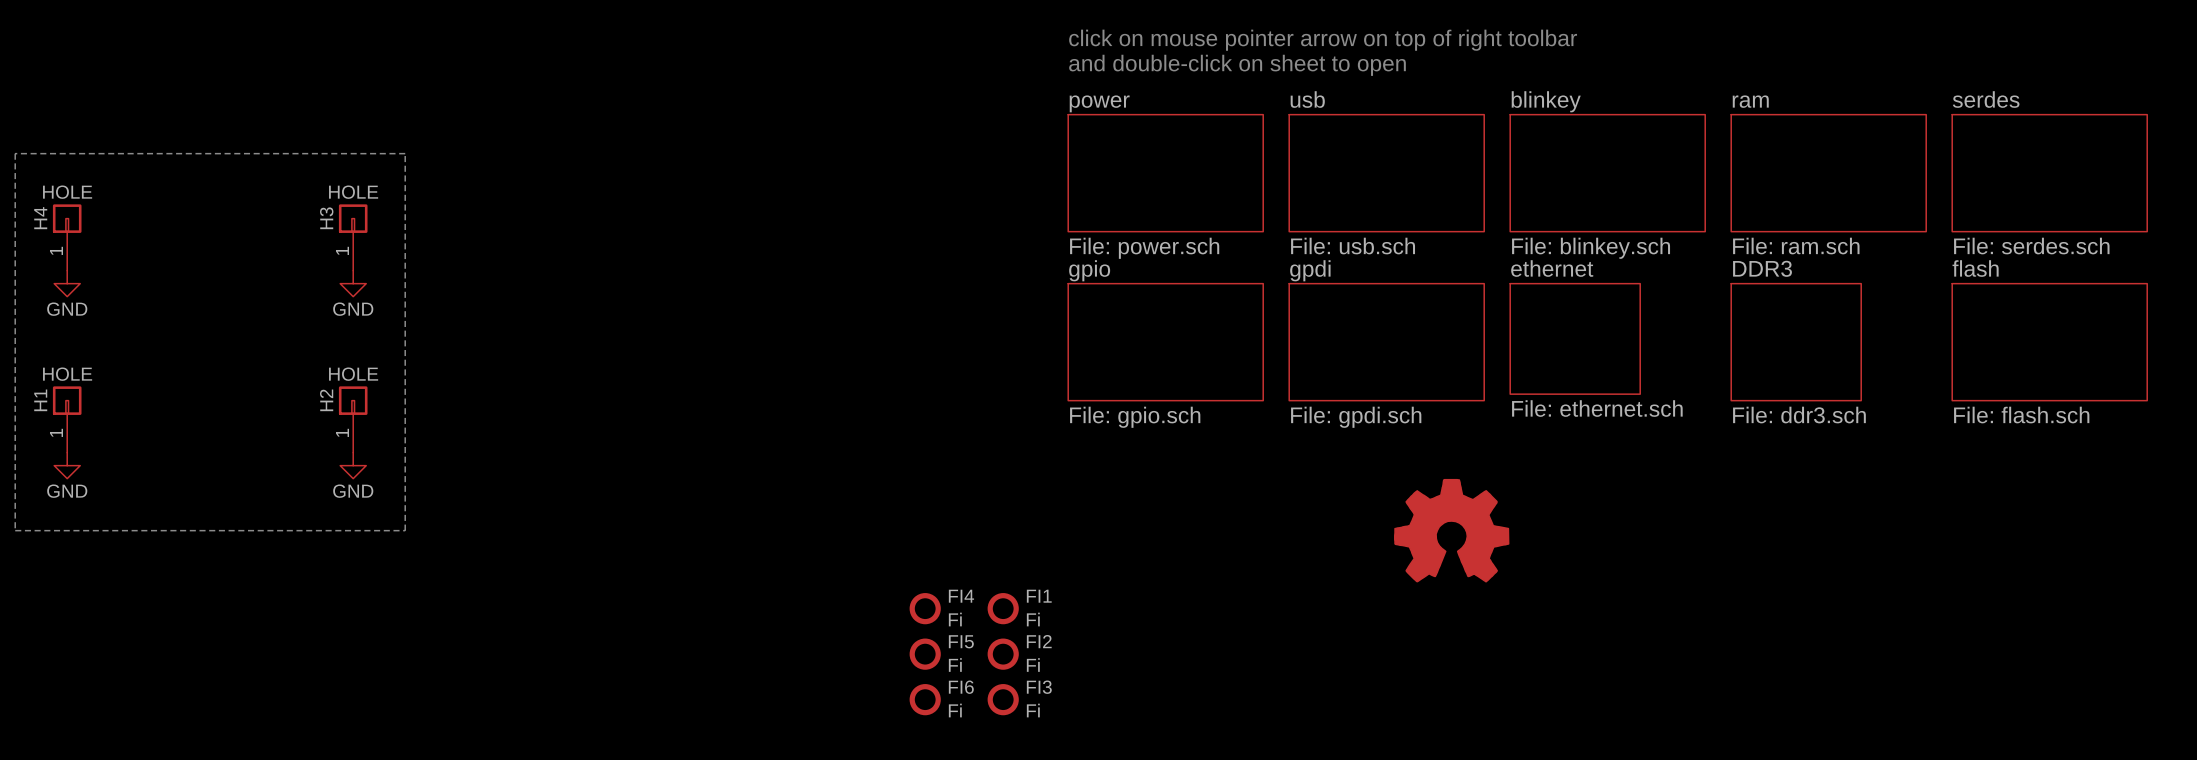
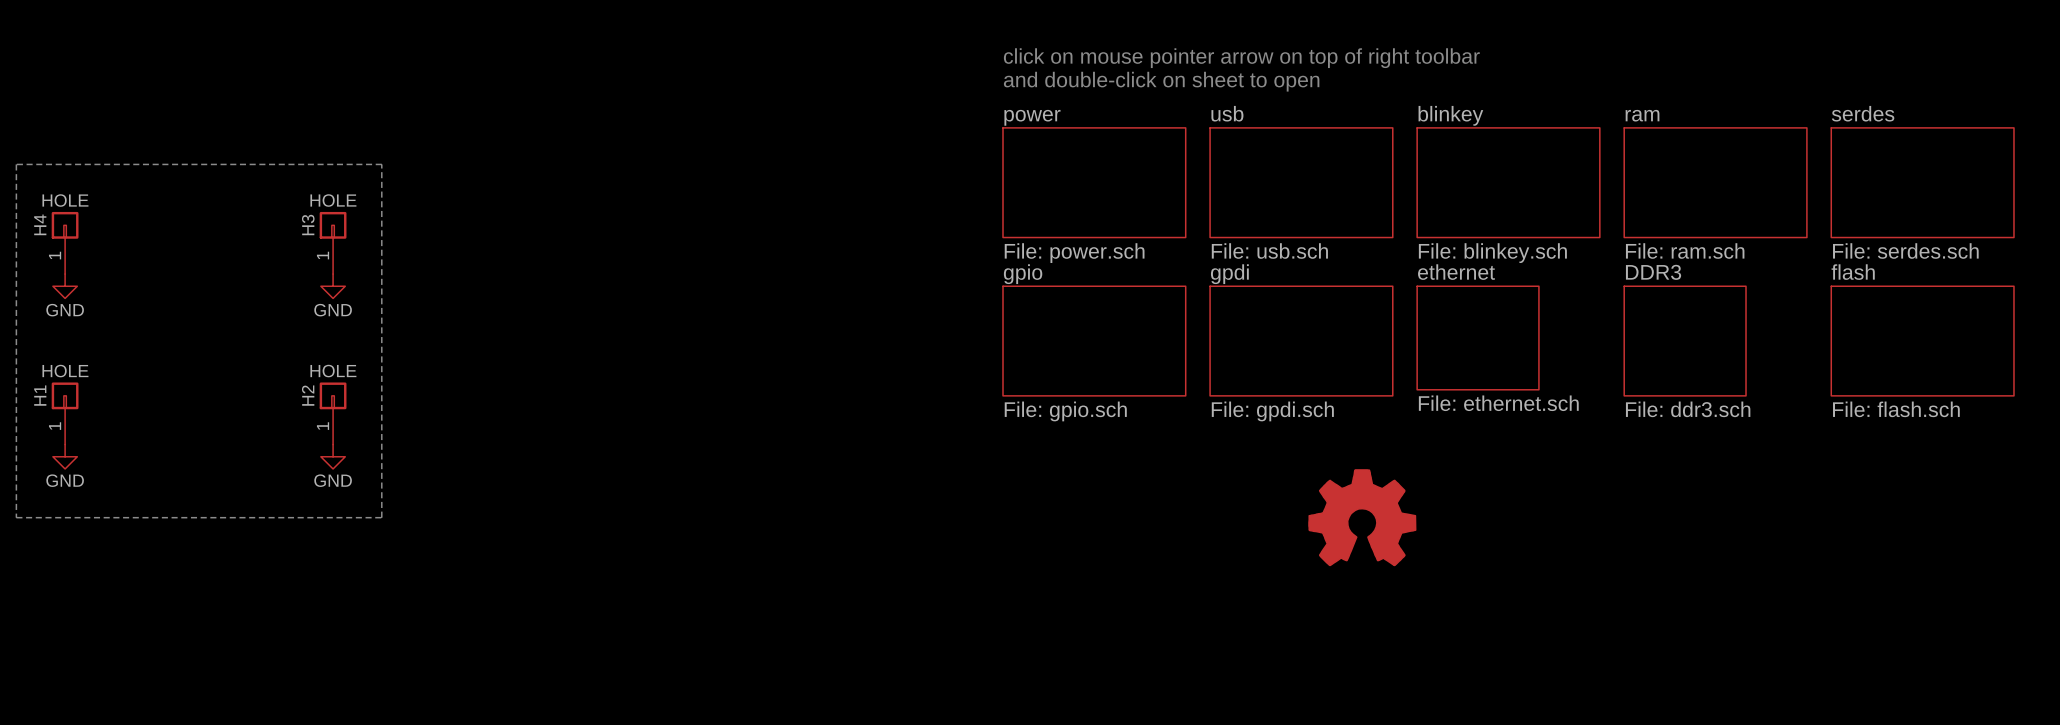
FI4: Fi (925, 608) -> none
FI1: Fi (1003, 608) -> none
FI5: Fi (925, 654) -> none
FI2: Fi (1003, 654) -> none
FI6: Fi (925, 699) -> none
FI3: Fi (1003, 699) -> none

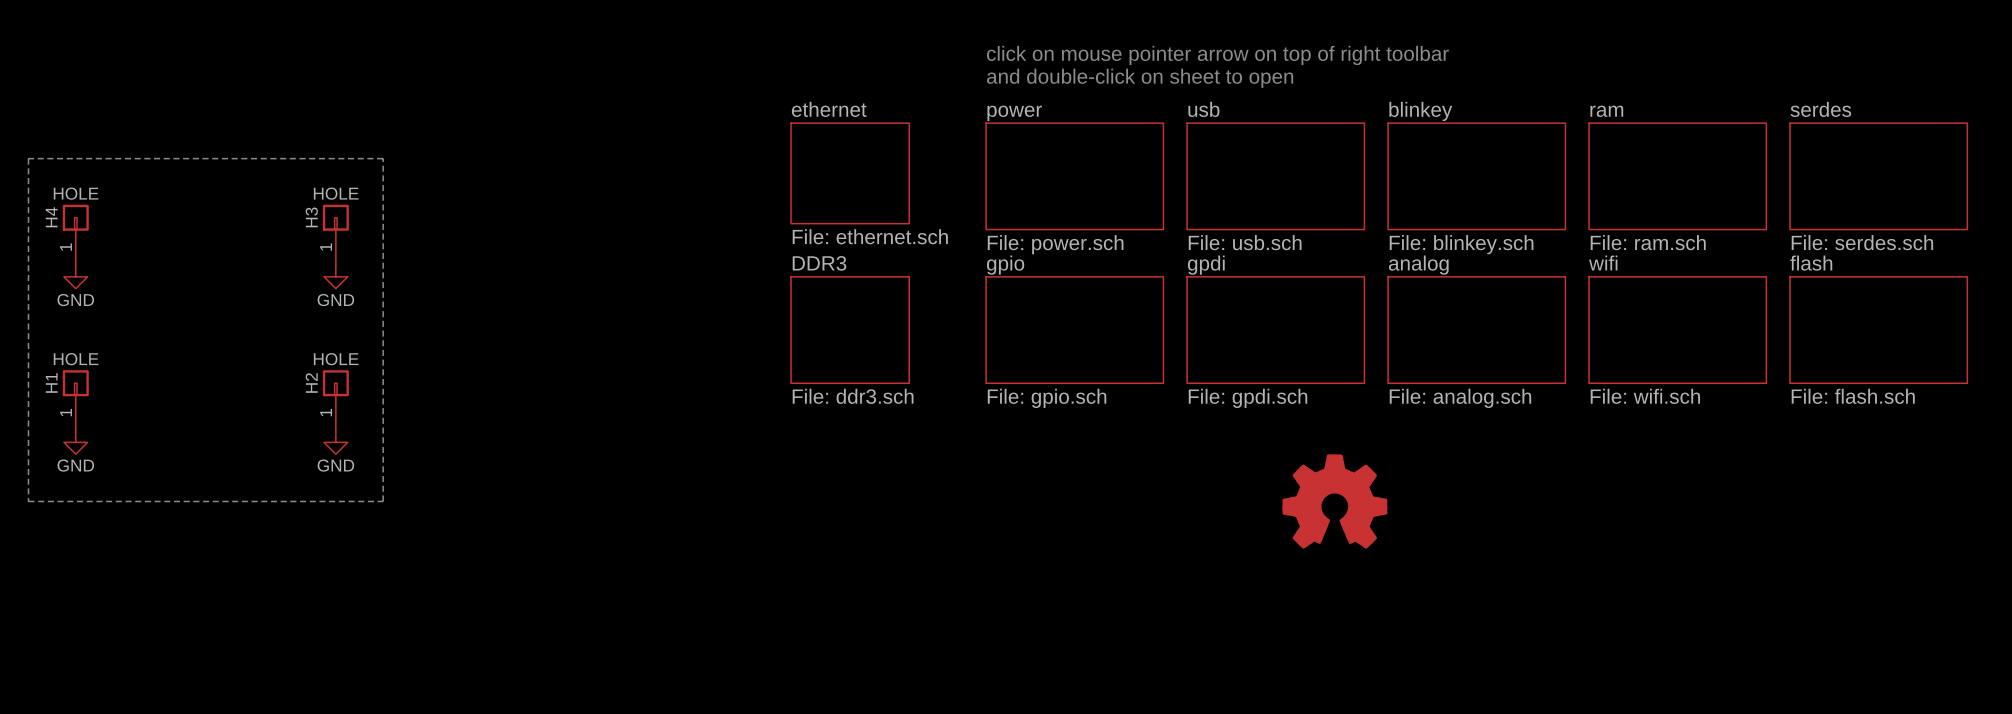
sheet ethernet: none -> File: ethernet.sch (850, 173)
sheet ethernet: File: ethernet.sch (1478, 338) -> none
sheet analog: none -> File: analog.sch (1476, 330)
sheet DDR3 position: (1685, 341) -> (850, 330)
sheet wifi: none -> File: wifi.sch (1677, 330)

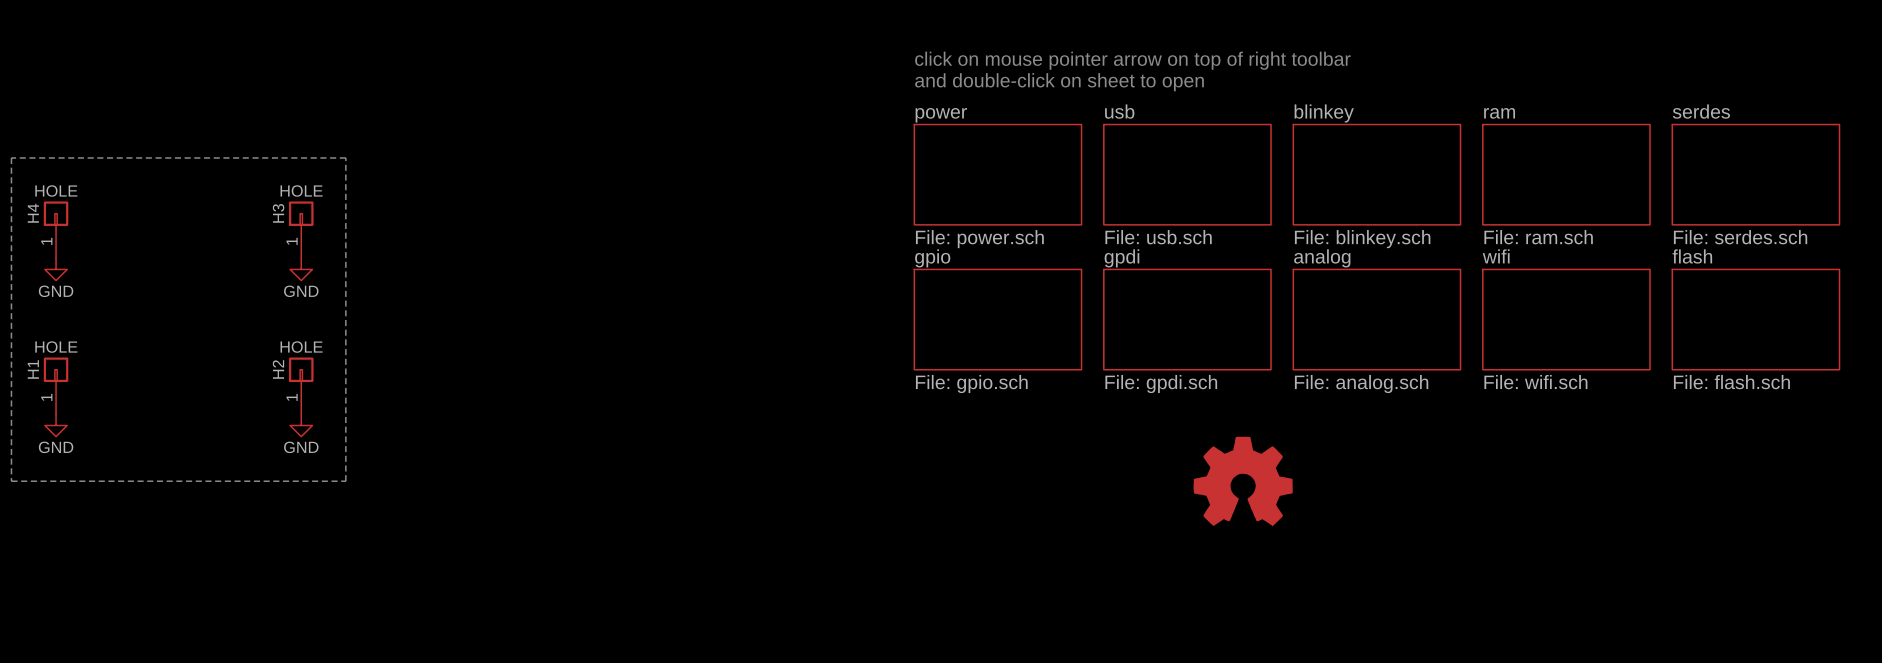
sheet ethernet: File: ethernet.sch (850, 173) -> none
sheet DDR3: File: ddr3.sch (850, 330) -> none

